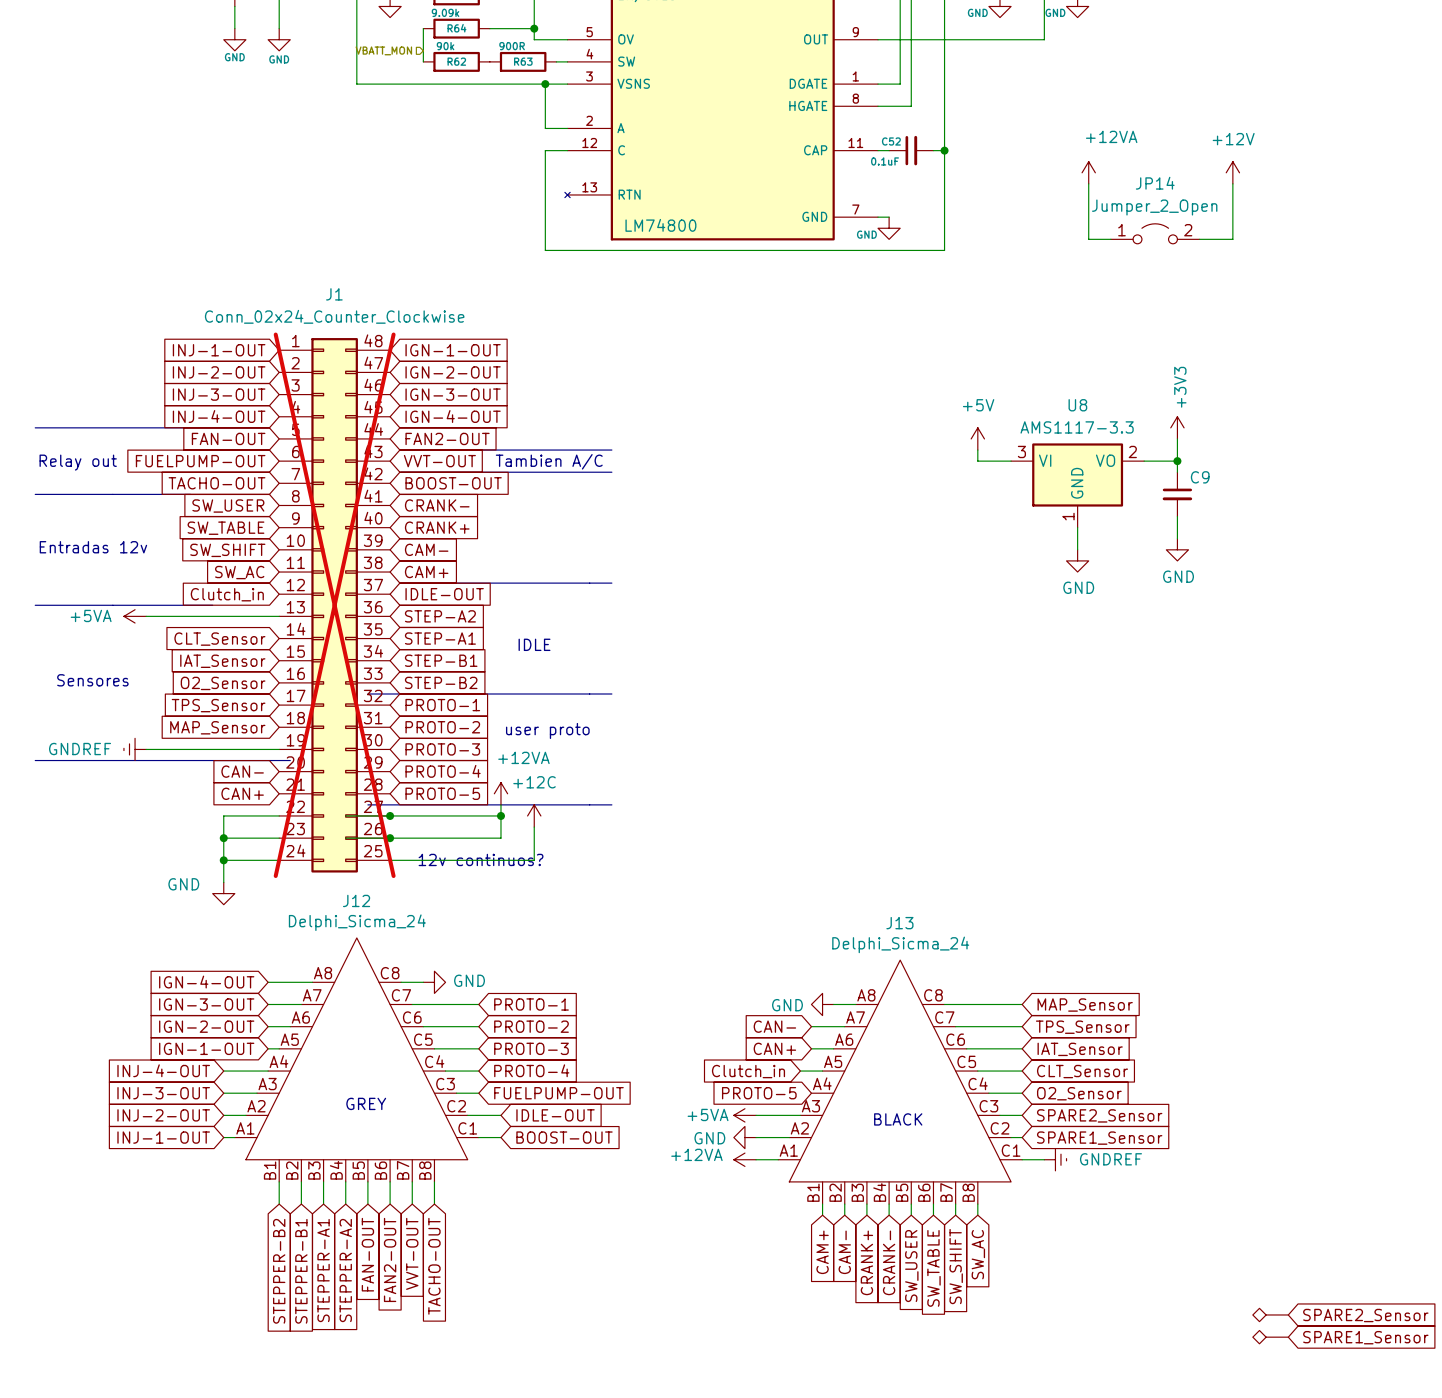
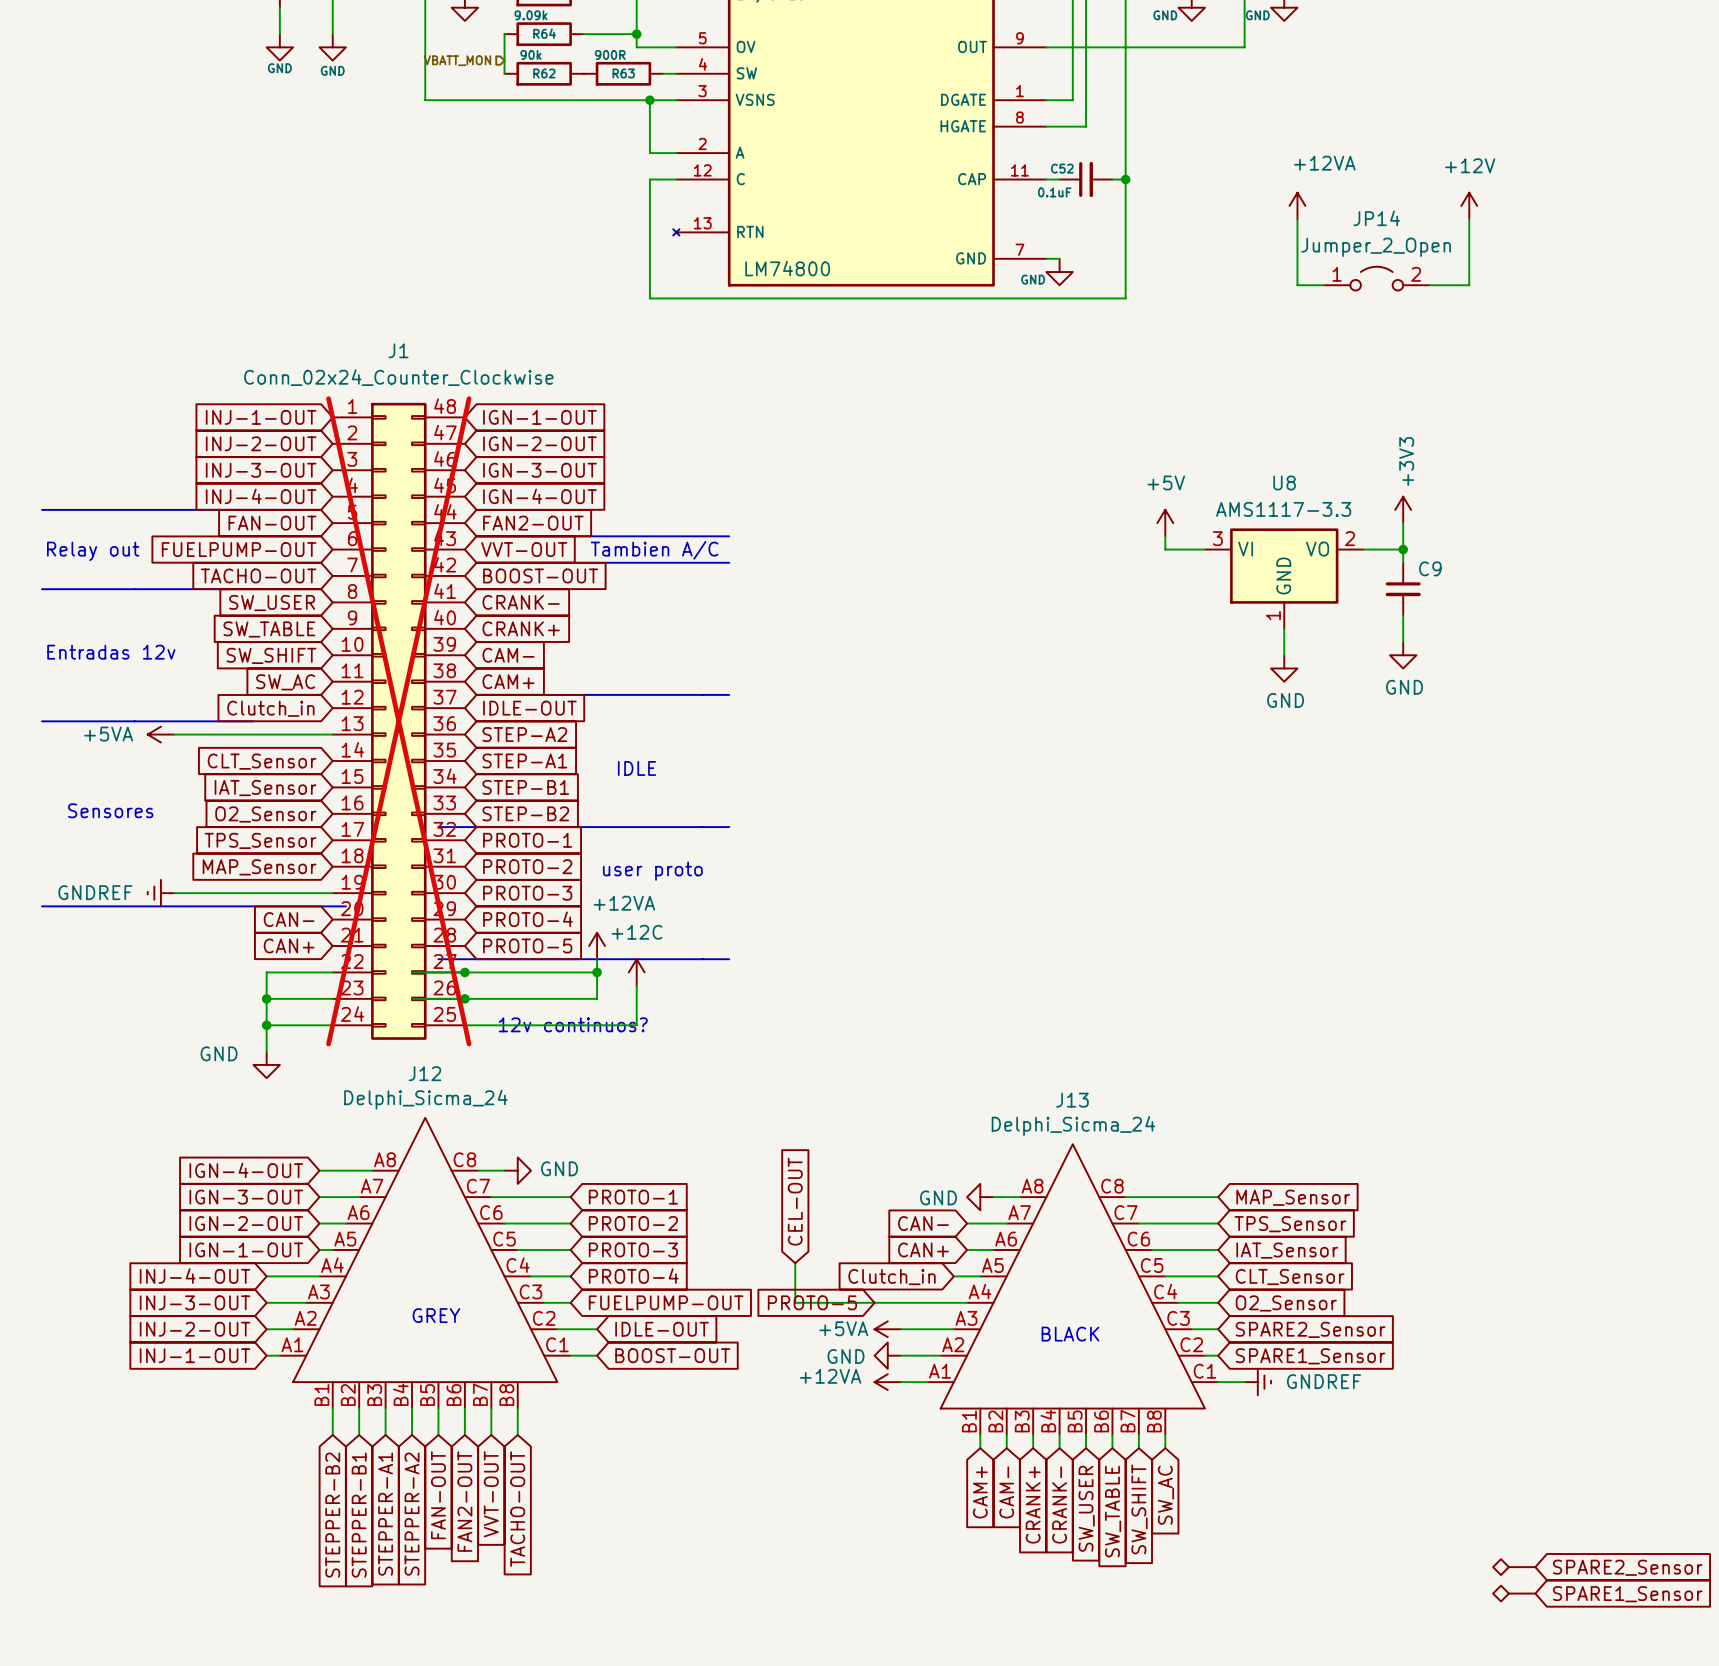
global label: none -> CEL-OUT (795, 1201)
wire: none -> (795, 1263) (795, 1302) (967, 1302)
global label position: PROTO-5 (759, 1093) -> PROTO-5 (812, 1302)

